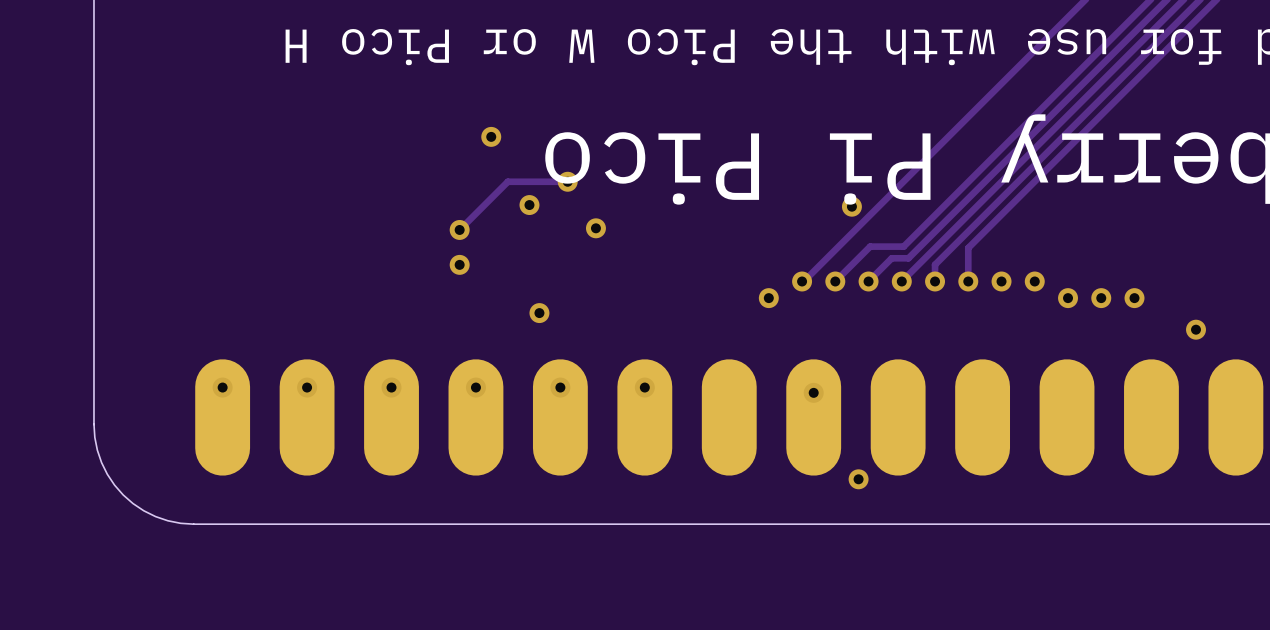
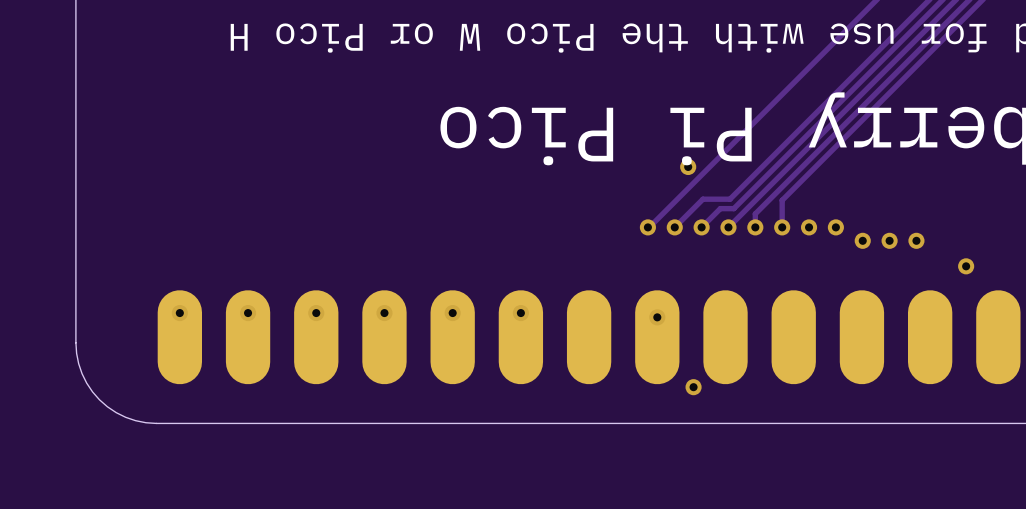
via: (491, 136) -> none
track: (567, 181) (507, 181) (459, 229) -> none
via: (567, 181) -> none
via: (529, 205) -> none
via: (595, 228) -> none
via: (459, 229) -> none
via: (459, 264) -> none
via: (768, 298) -> none
via: (539, 313) -> none

